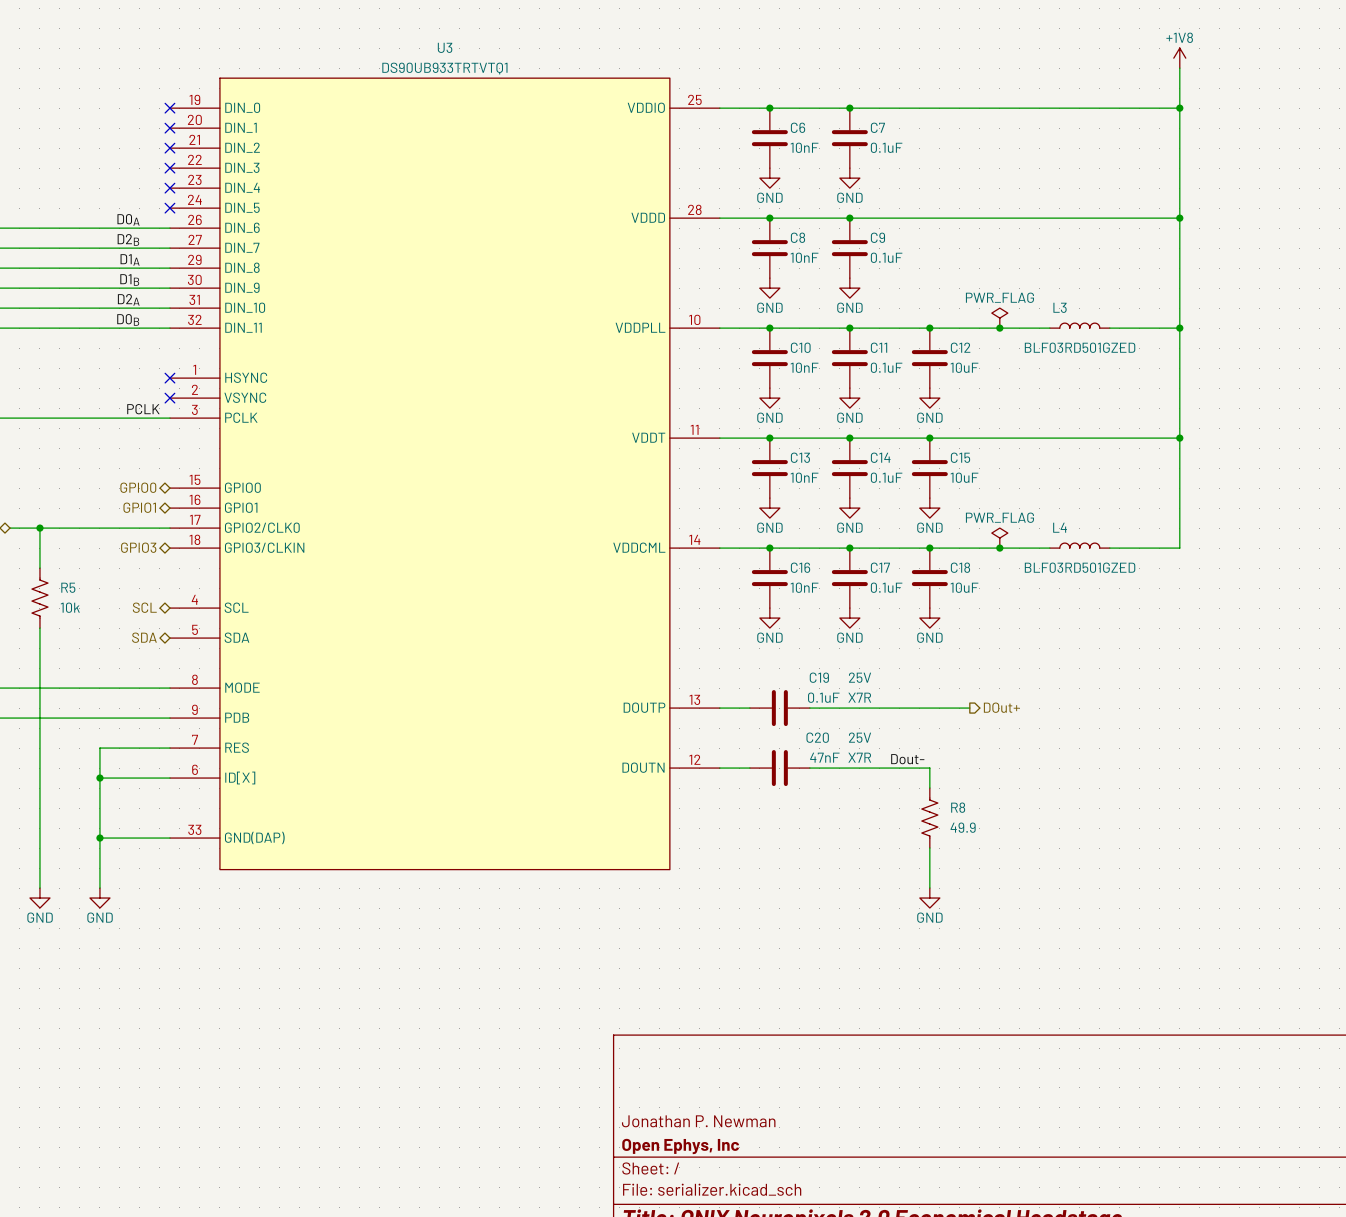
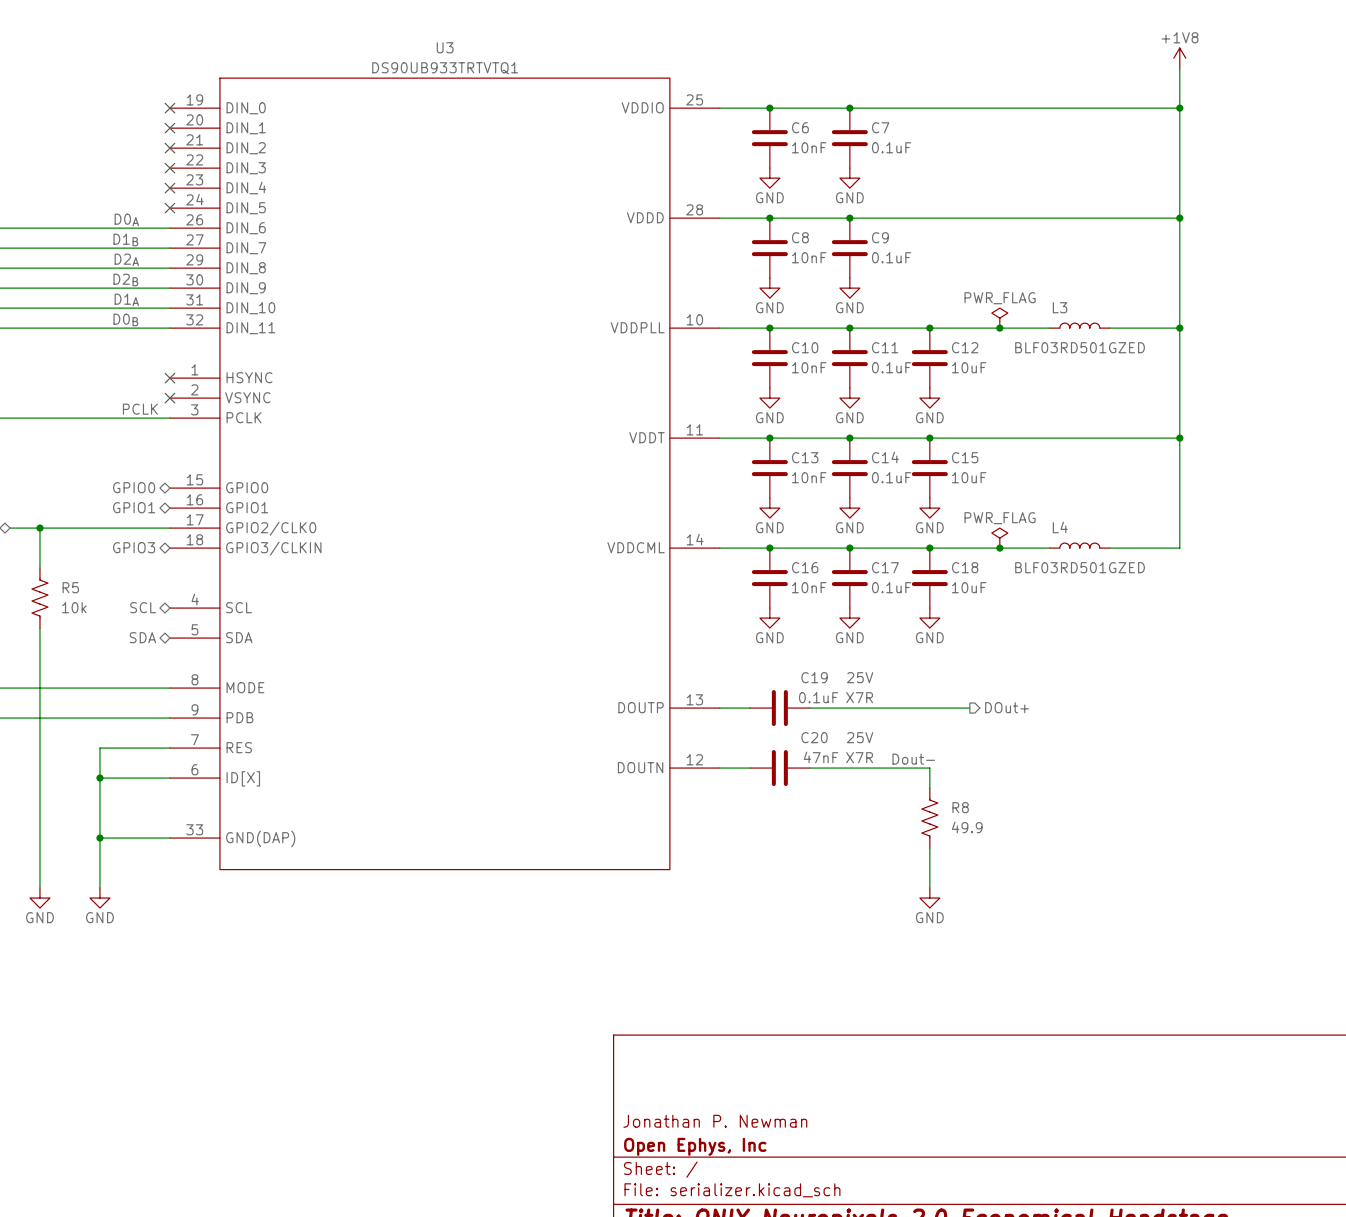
label: D2B (128, 239) -> D1B (125, 239)
label: D1A (130, 259) -> D2A (126, 259)
label: D1B (129, 279) -> D2B (125, 279)
label: D2A (128, 299) -> D1A (126, 299)

